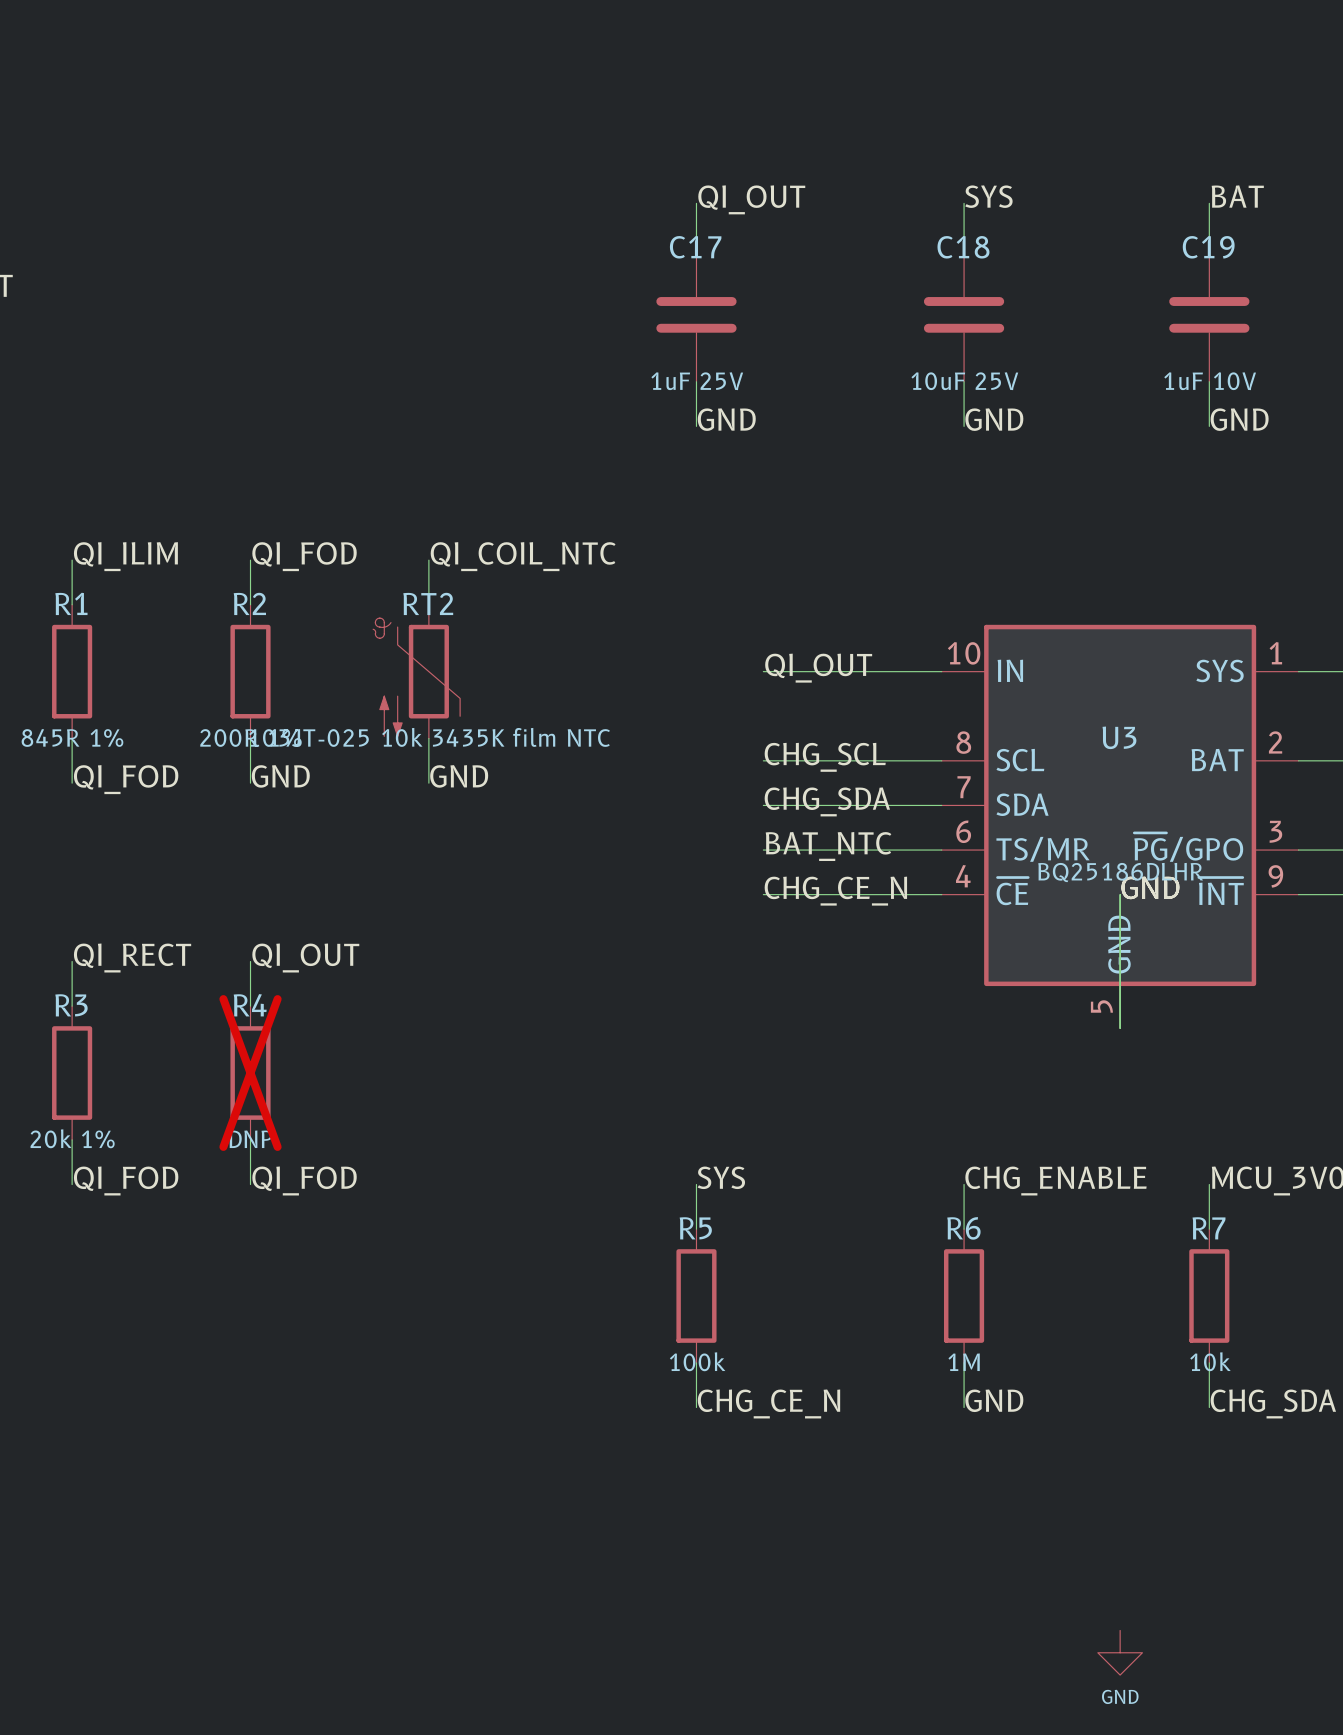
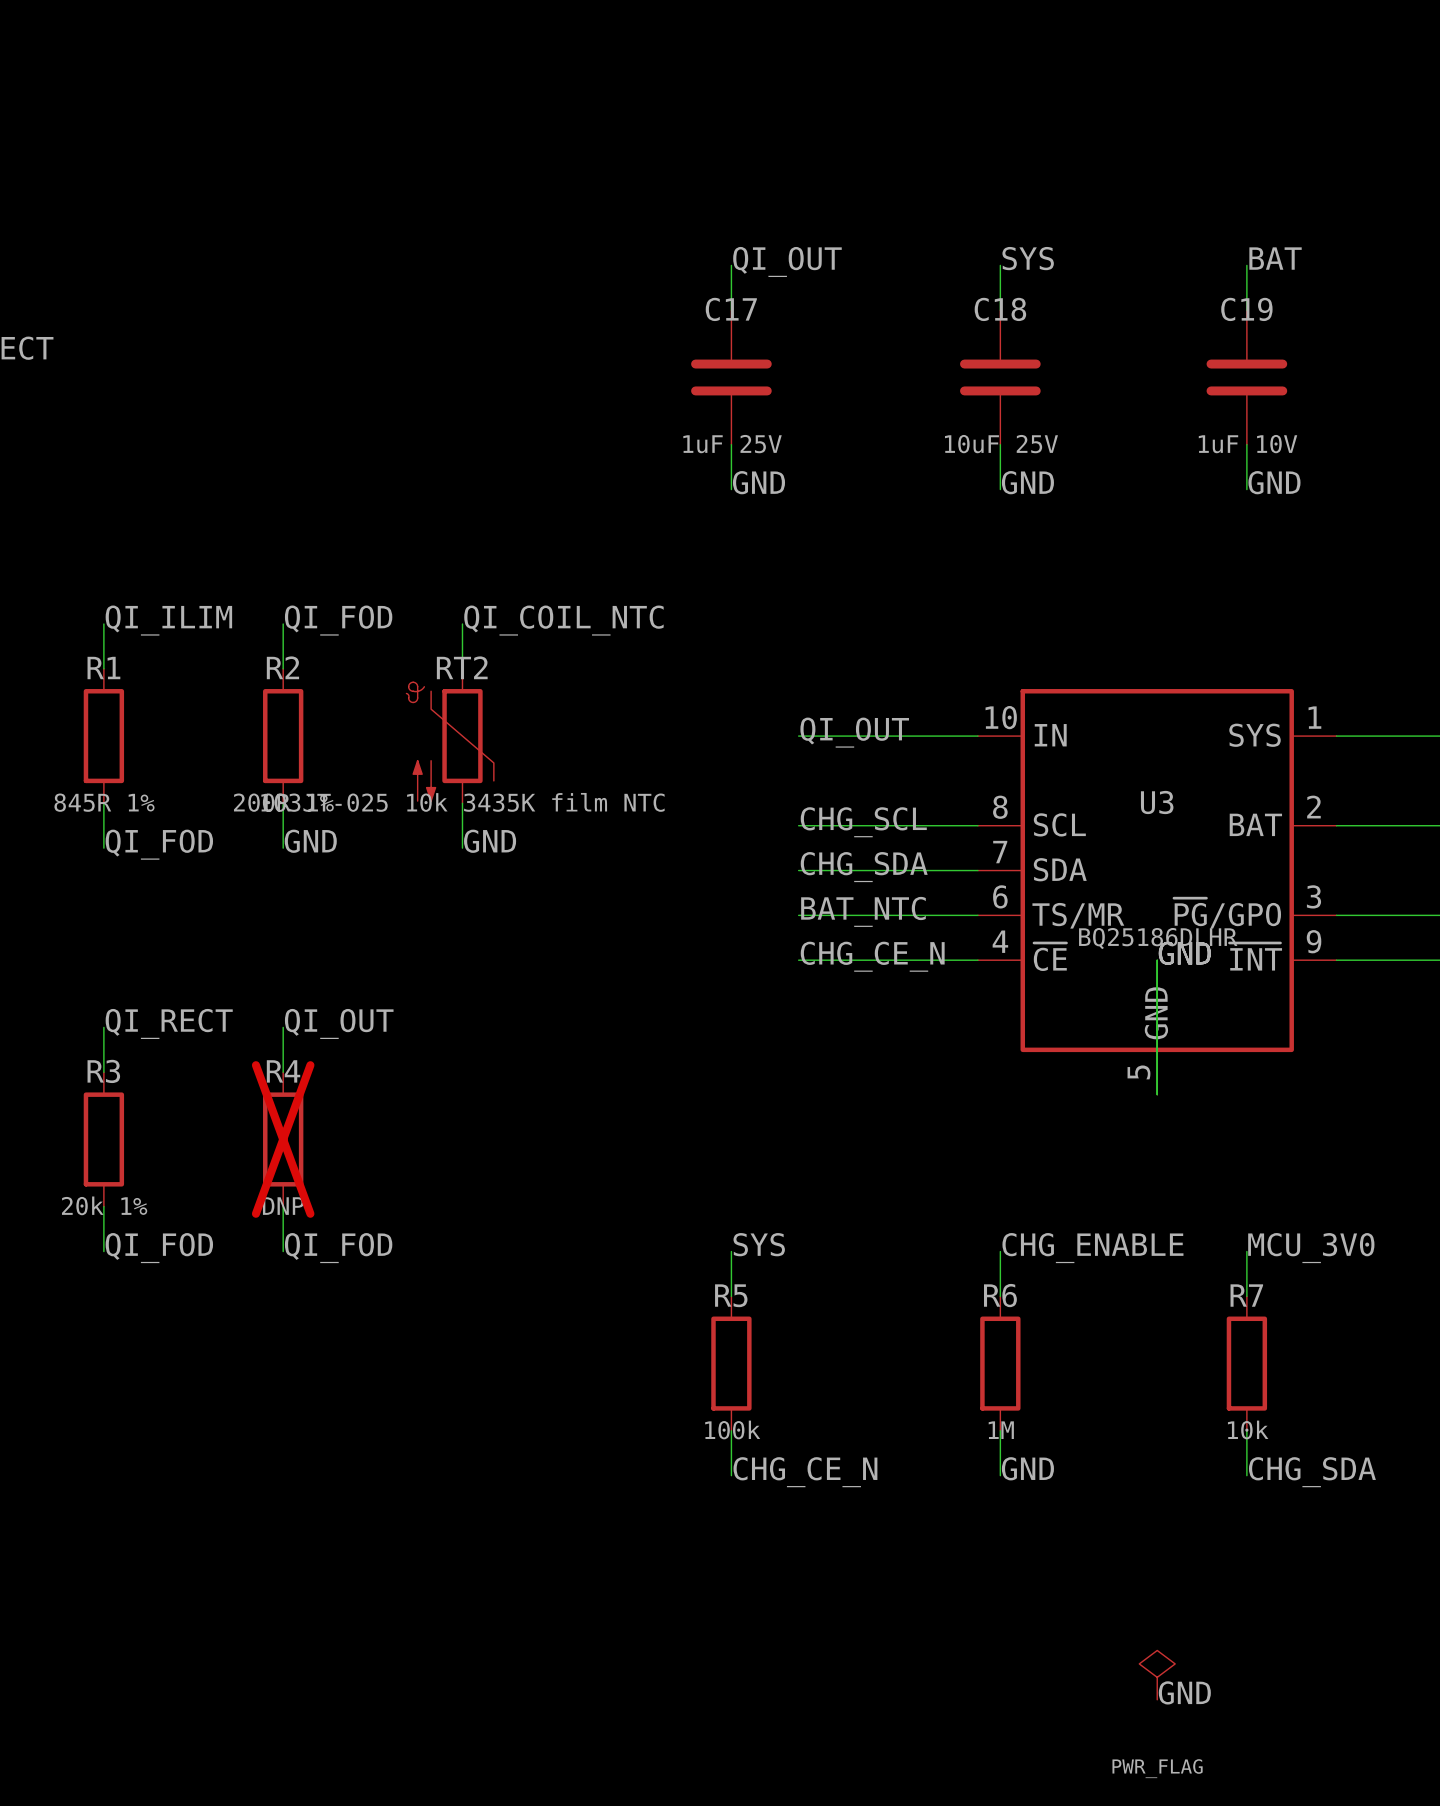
power symbol: none -> PWR_FLAG (1157, 1675)
label: none -> GND (1184, 1692)
power symbol: GND (1120, 1652) -> none

